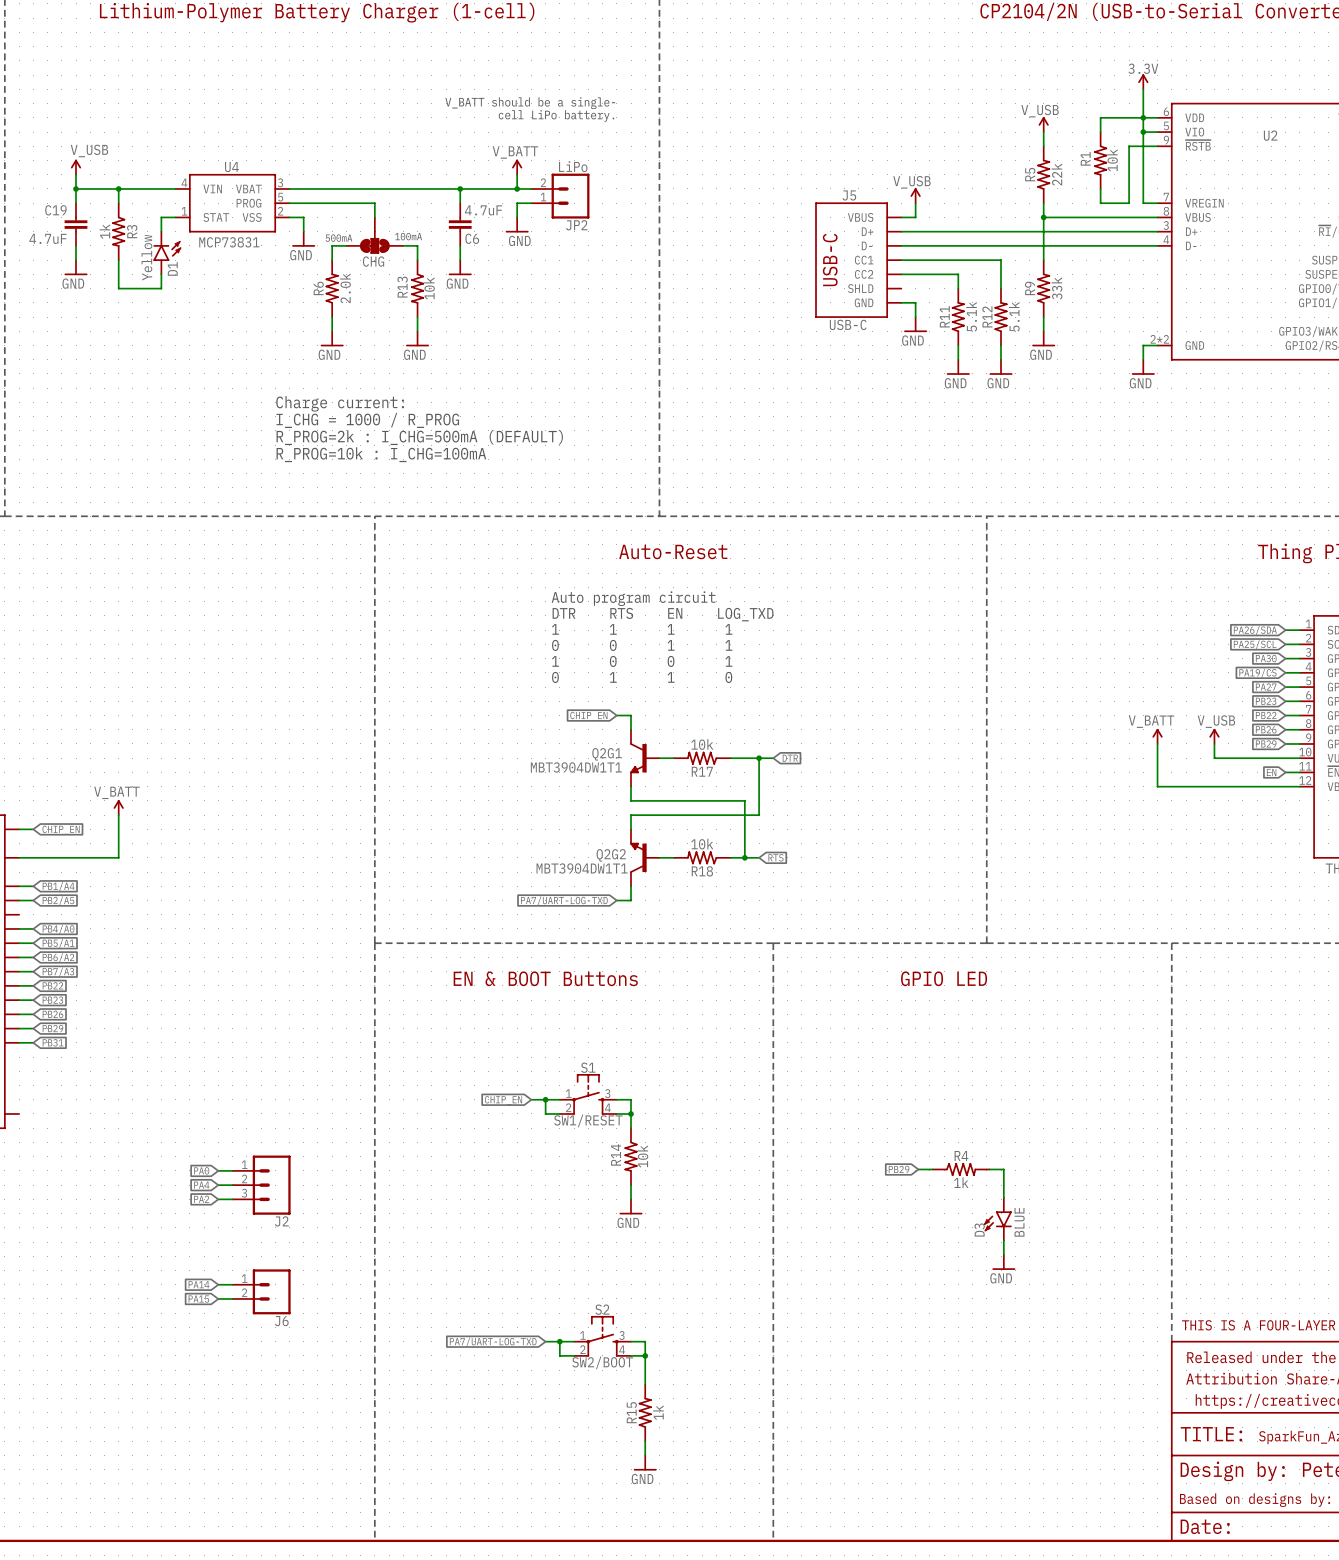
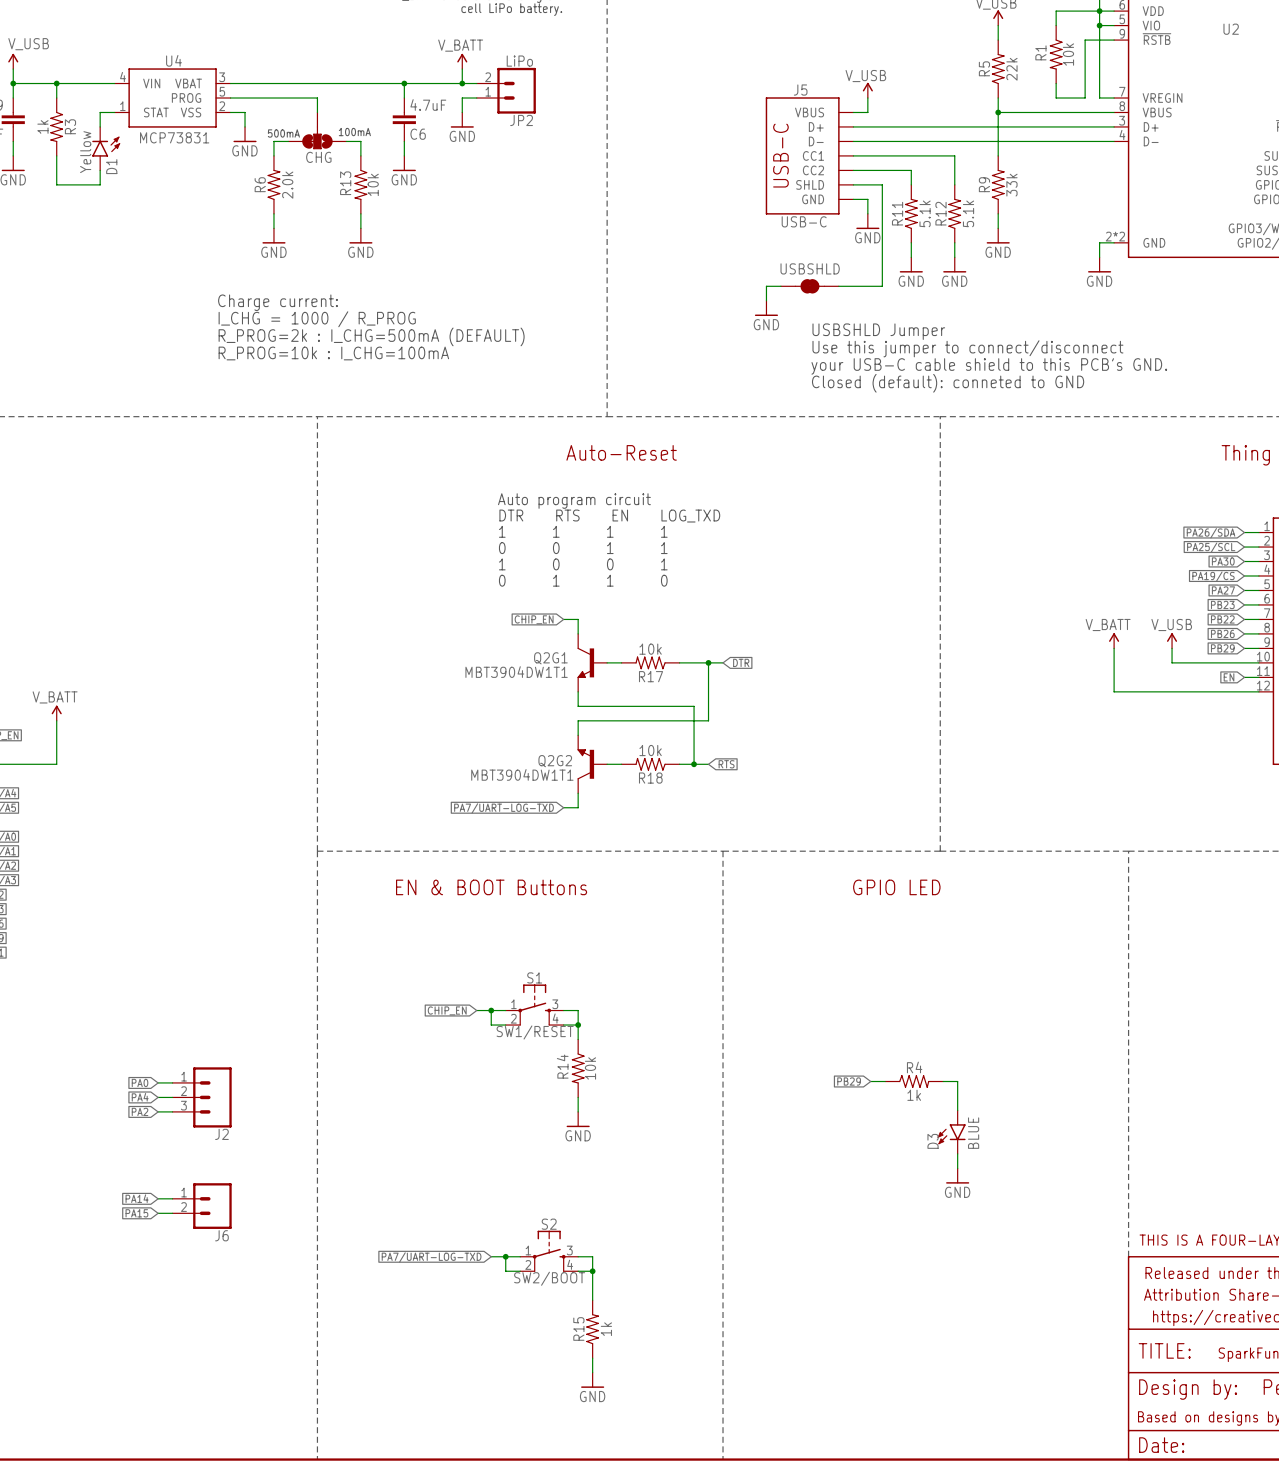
wire: none -> (853, 184) (882, 184) (882, 286) (838, 286)
wire: none -> (780, 286) (766, 286) (766, 300)
USBSHLD: none -> (809, 286)
power symbol: none -> GND (766, 308)
text: none -> USBSHLD Jumper (878, 331)
text: none -> Use this jumper to connect/disconnect (967, 348)
text: none -> your USB-C cable shield to this PCB's GND. (989, 366)
text: none -> Closed (default): conneted to GND (948, 383)

